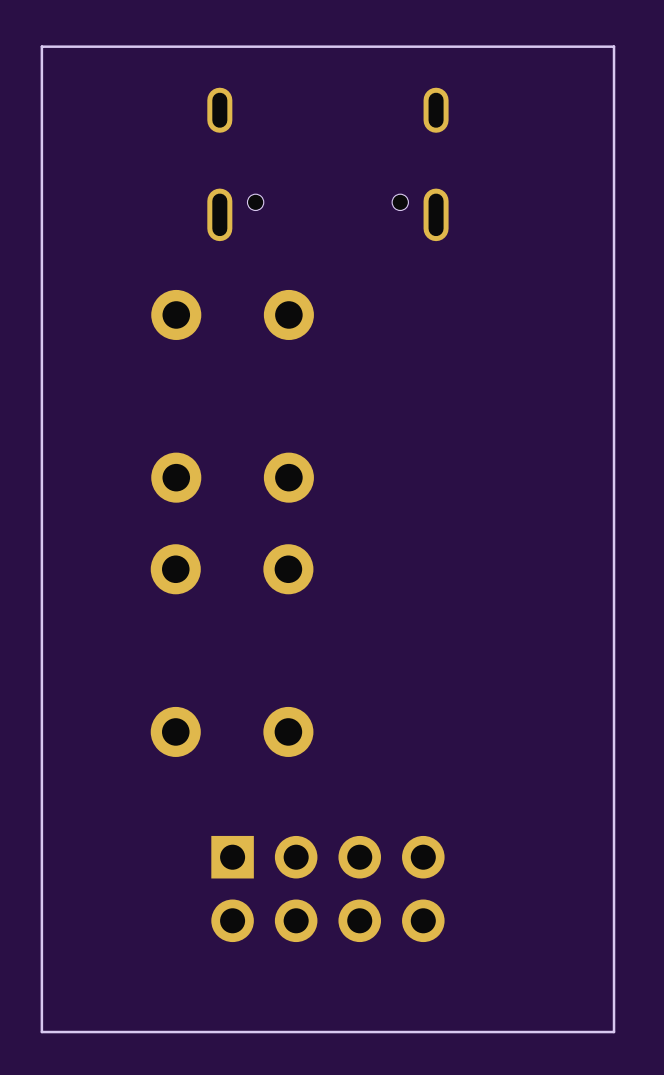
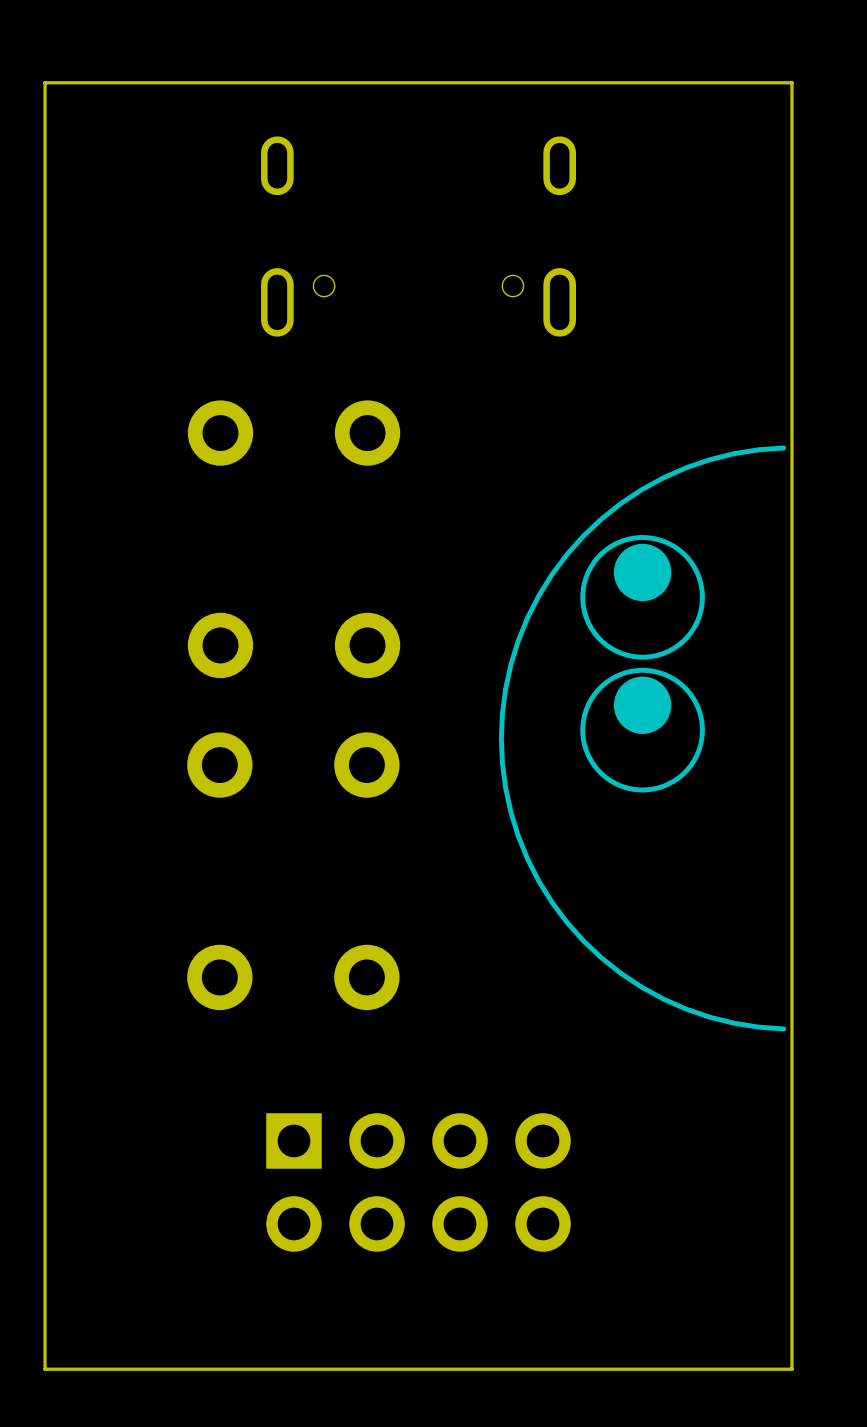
line: none -> (783, 447) (734, 453) (686, 467) (663, 477) (621, 503) (583, 535) (552, 574) (538, 595) (518, 640) (505, 688) (501, 738) (505, 788) (518, 836) (538, 881) (552, 902) (583, 940) (621, 973) (641, 987) (686, 1009) (734, 1023) (783, 1028)
drawing: none -> [580, 535, 705, 793]

